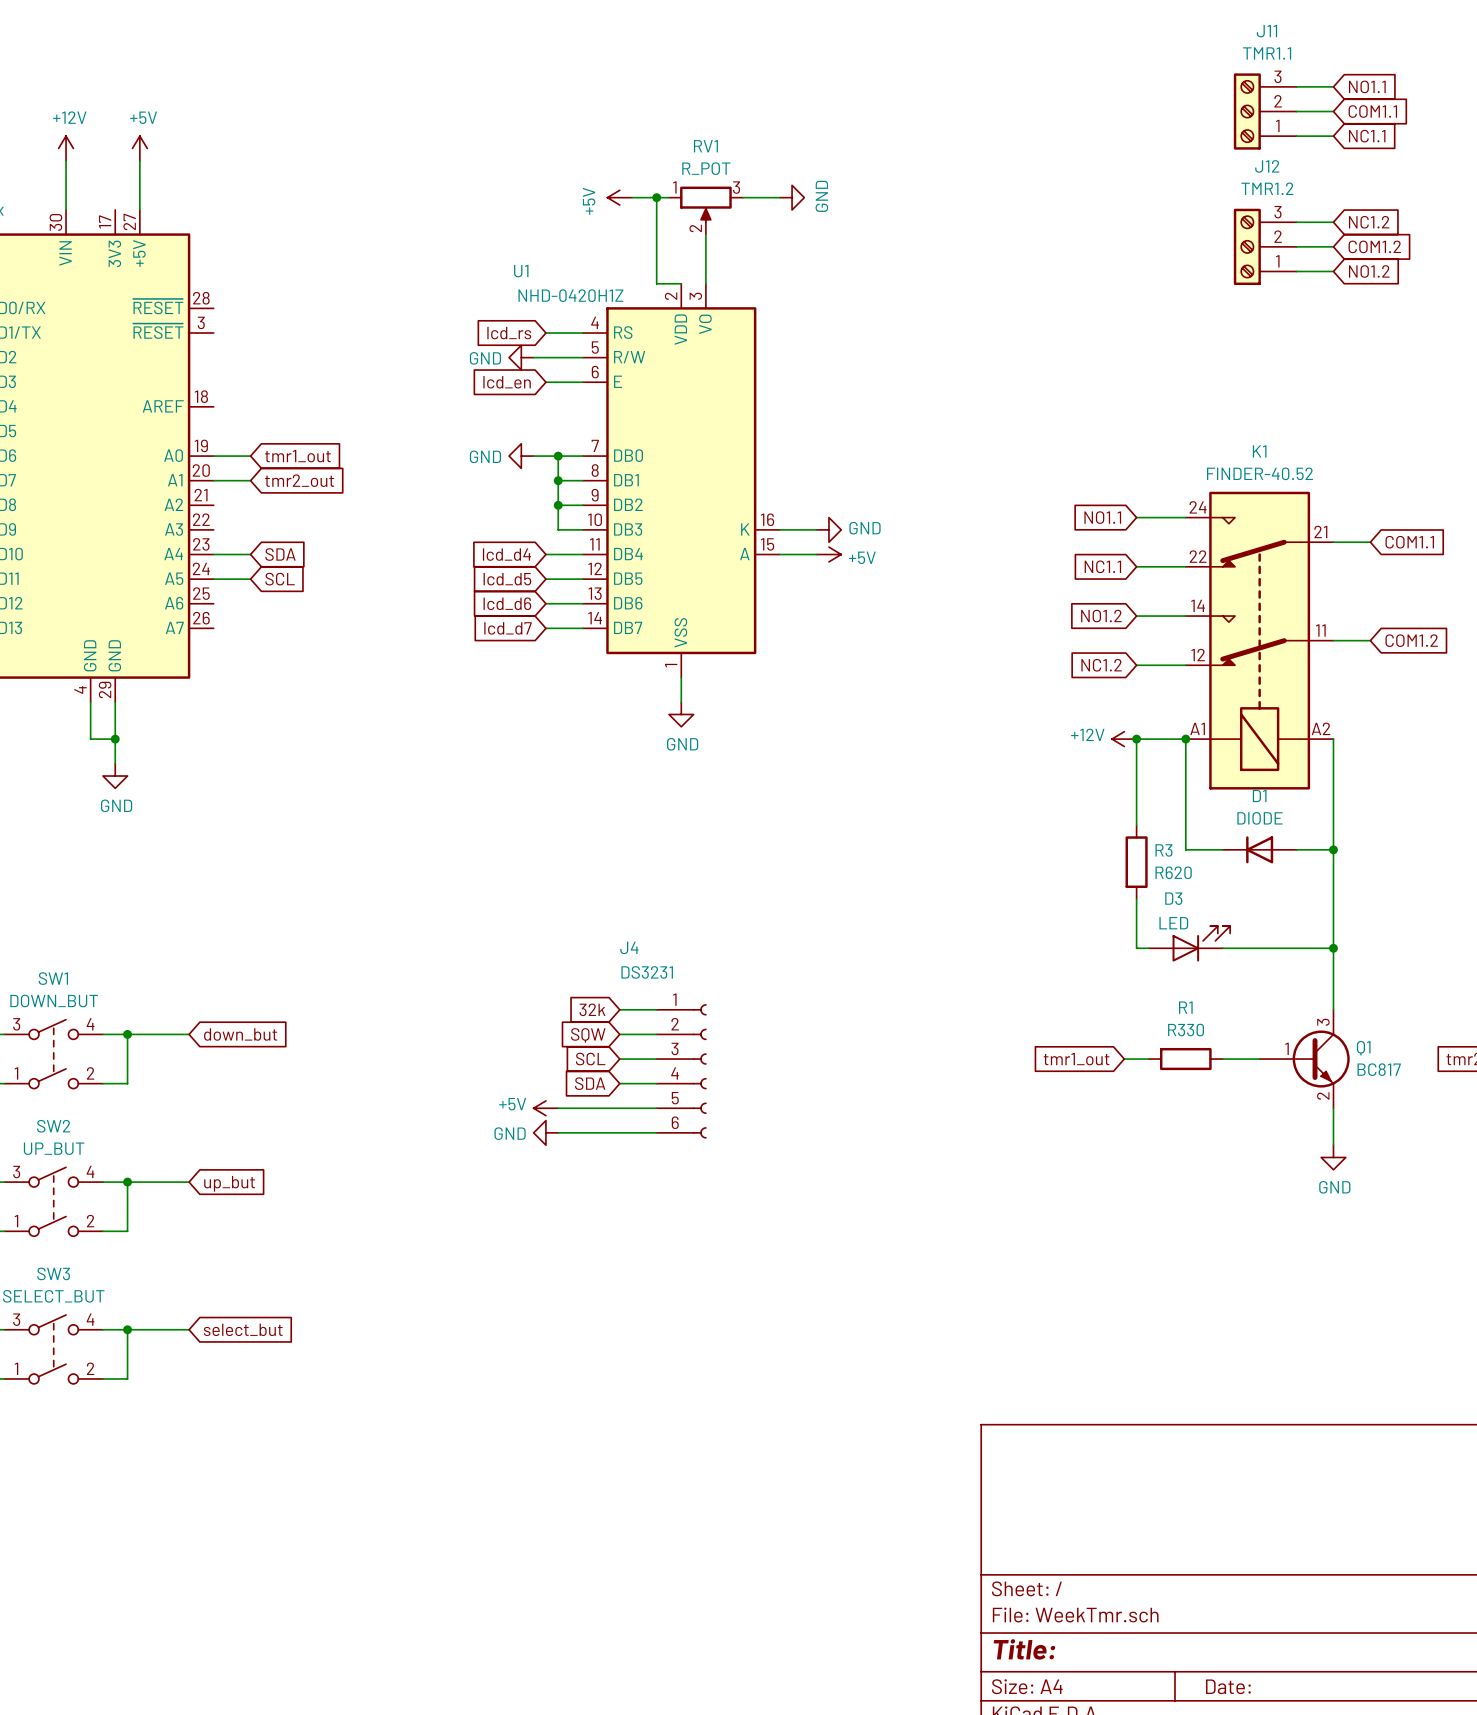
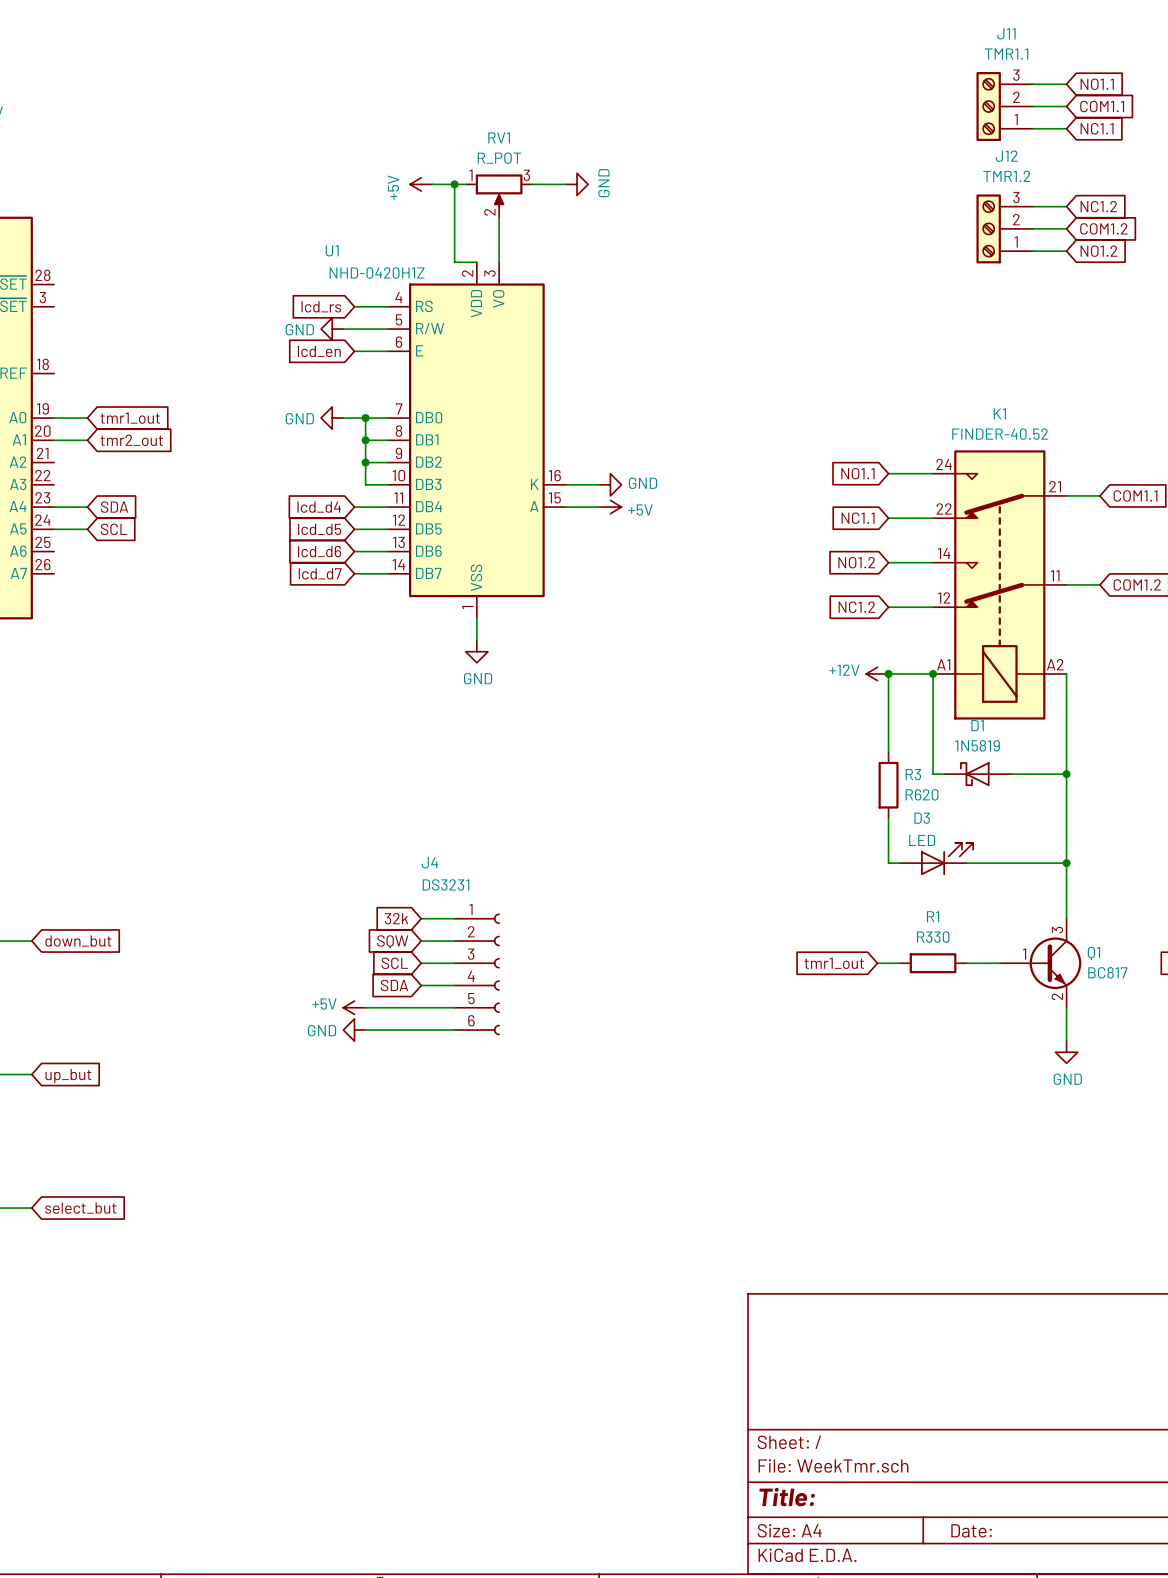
D1 value: DIODE (1259, 818) -> 1N5819 (977, 745)
D1 symbol: [1222, 836, 1297, 864] -> [944, 762, 1011, 787]

